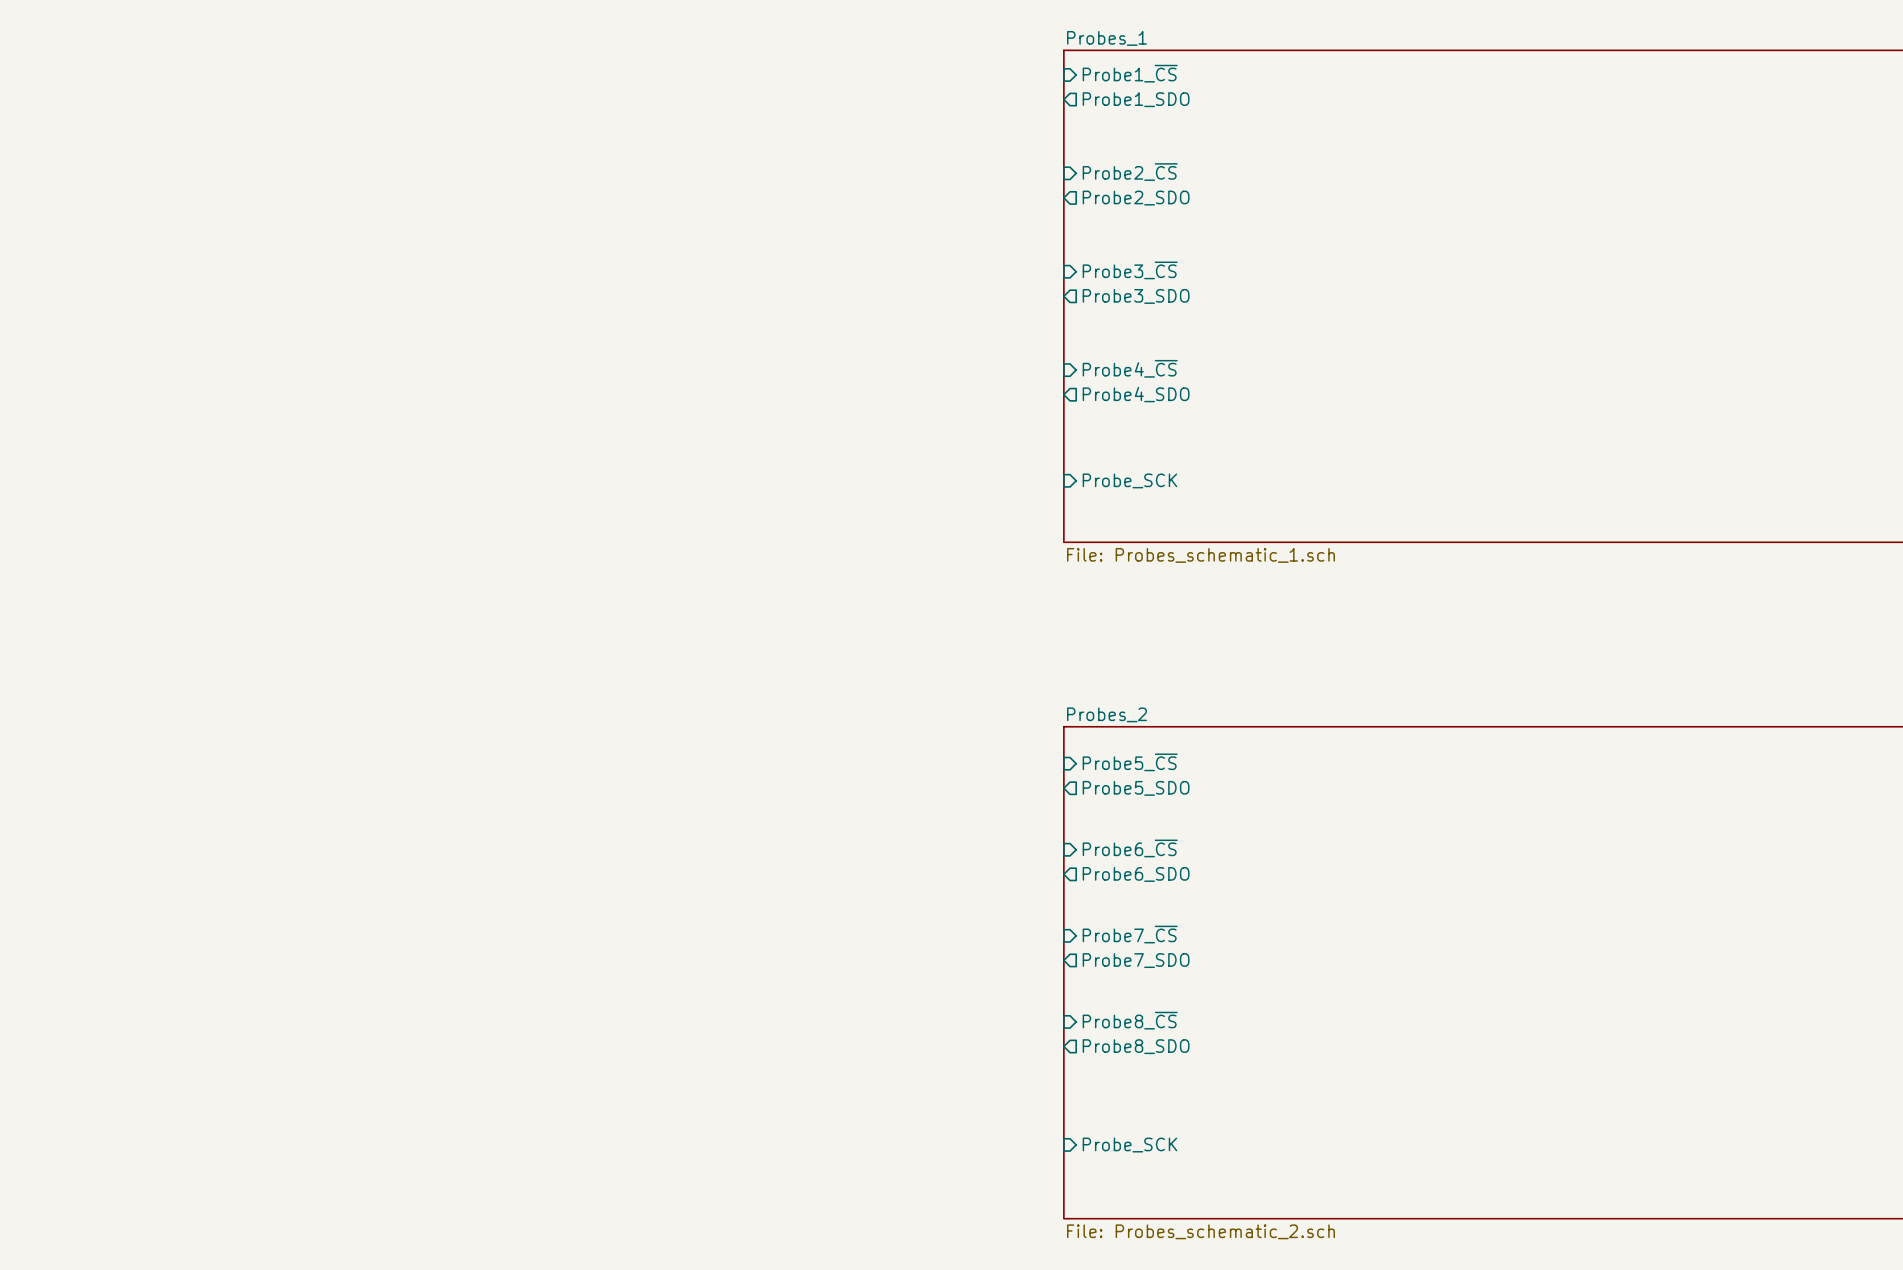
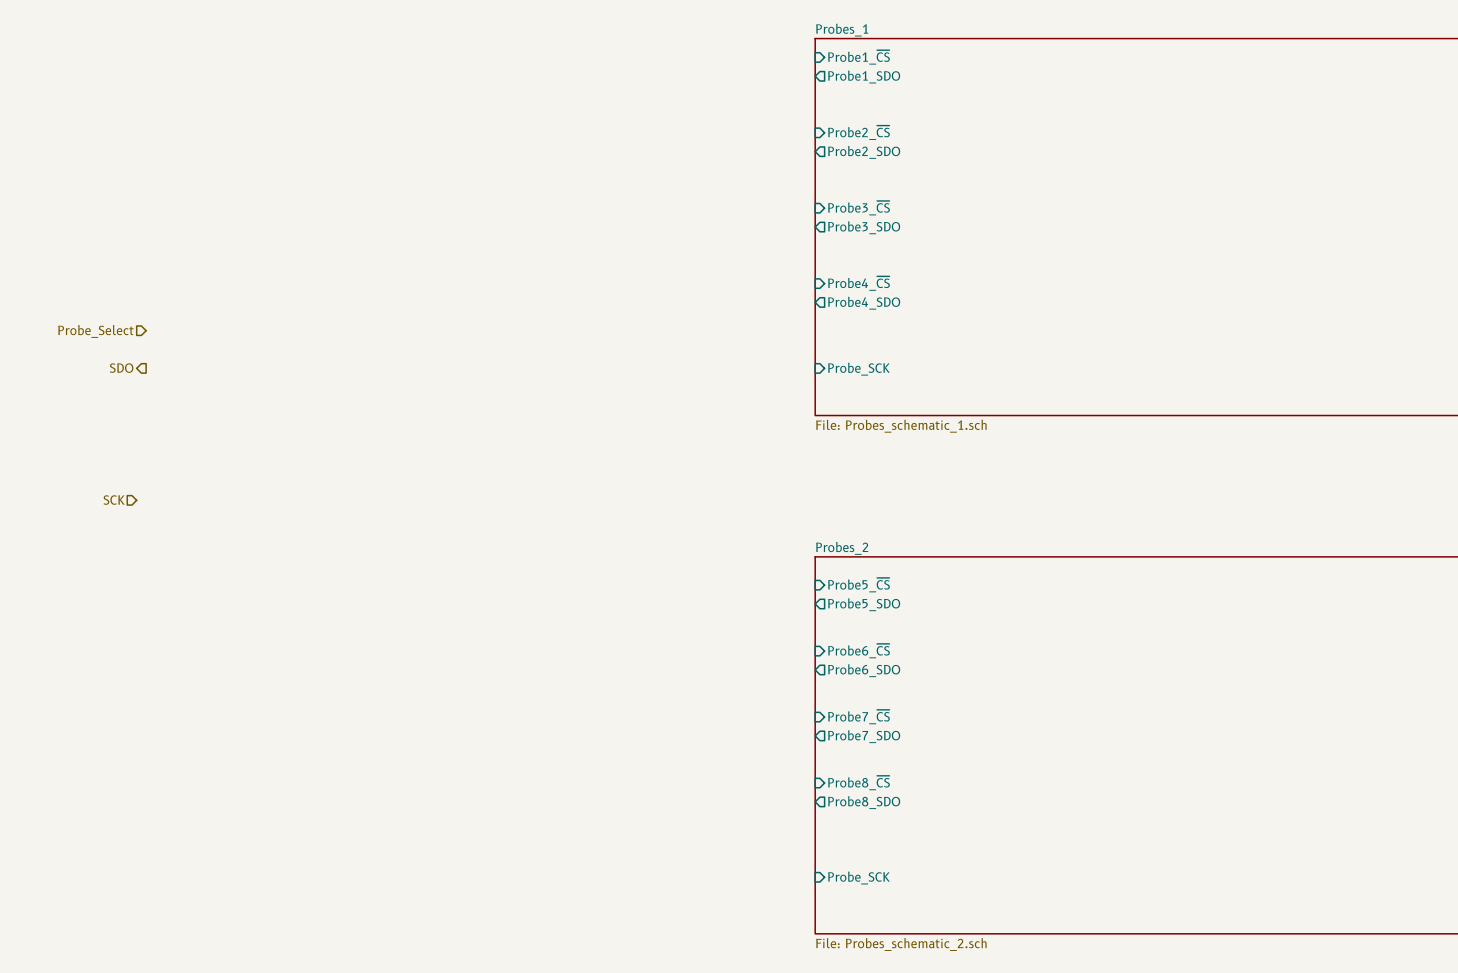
hierarchical label: none -> Probe_Select (95, 331)
hierarchical label: none -> SDO (121, 368)
hierarchical label: none -> SCK (114, 500)

